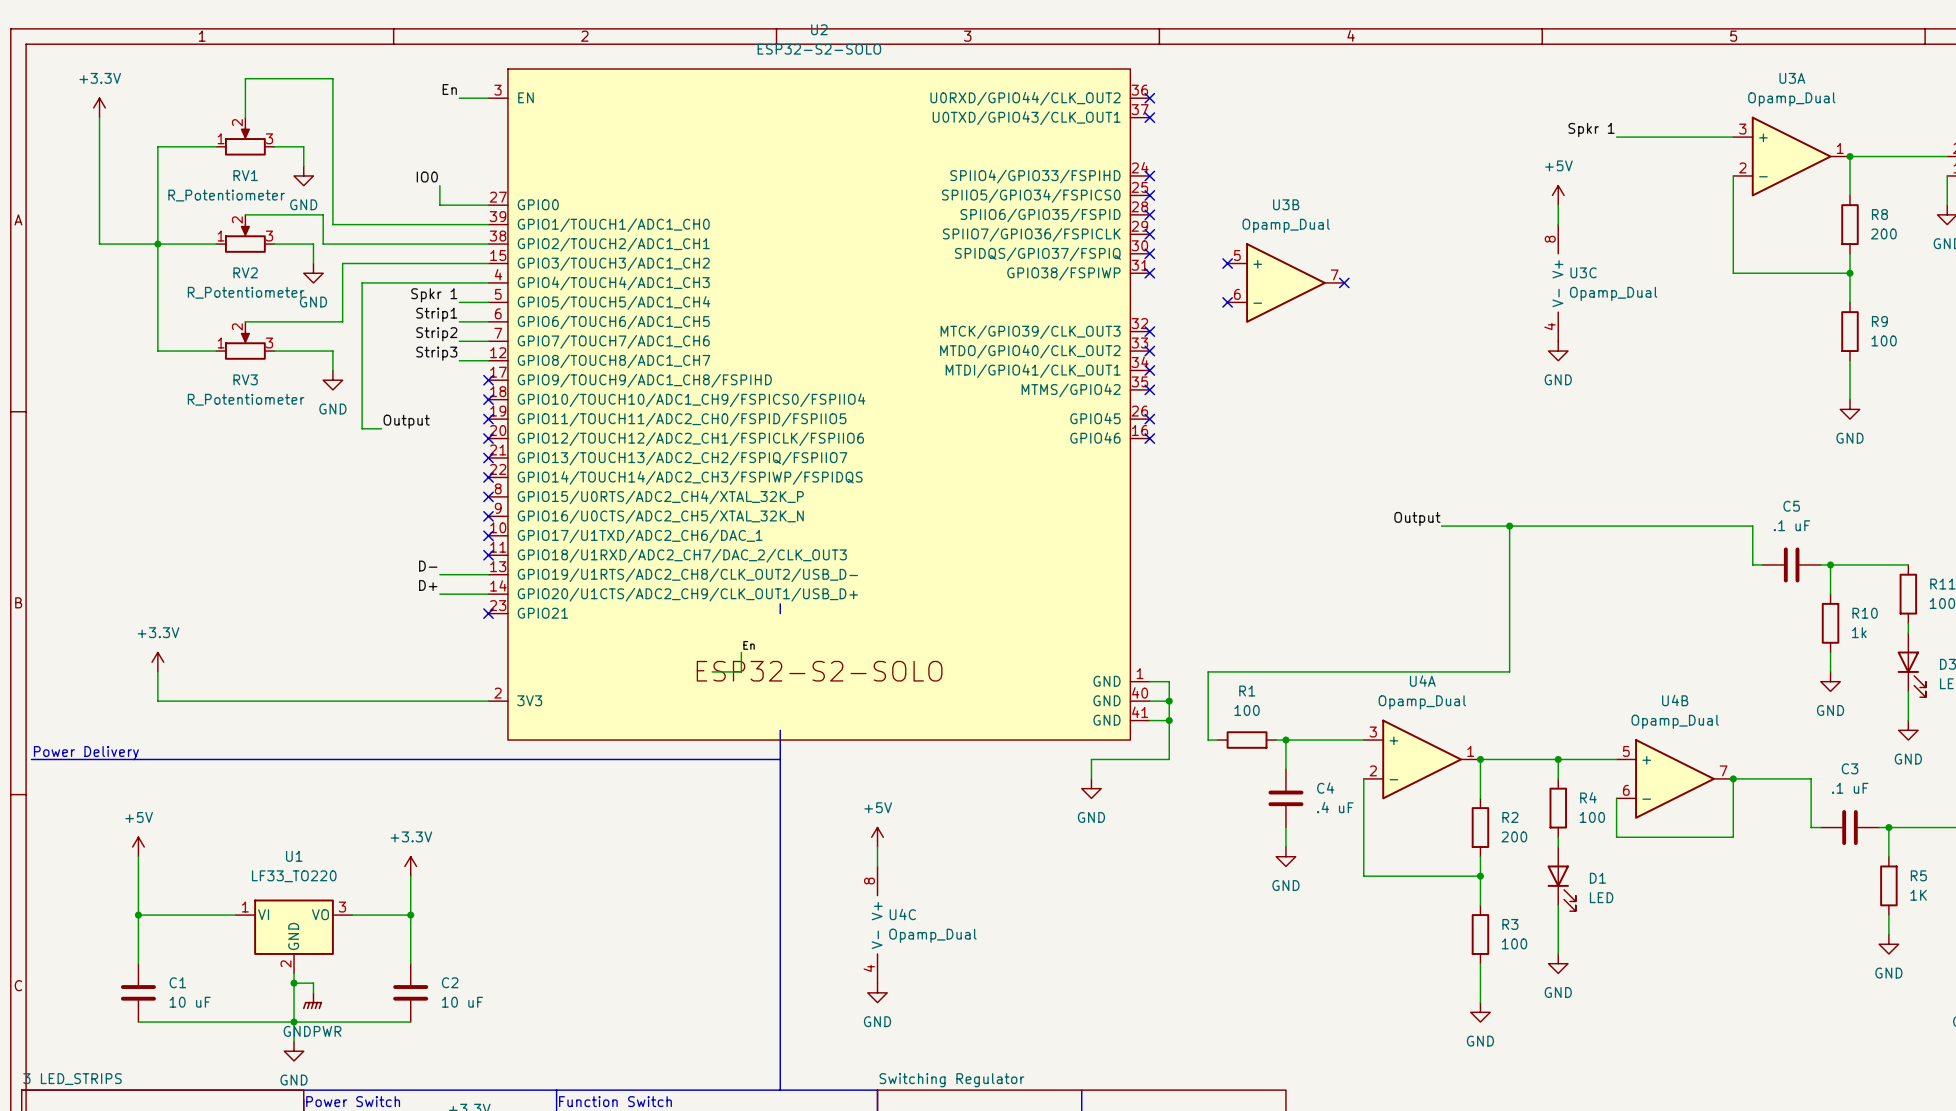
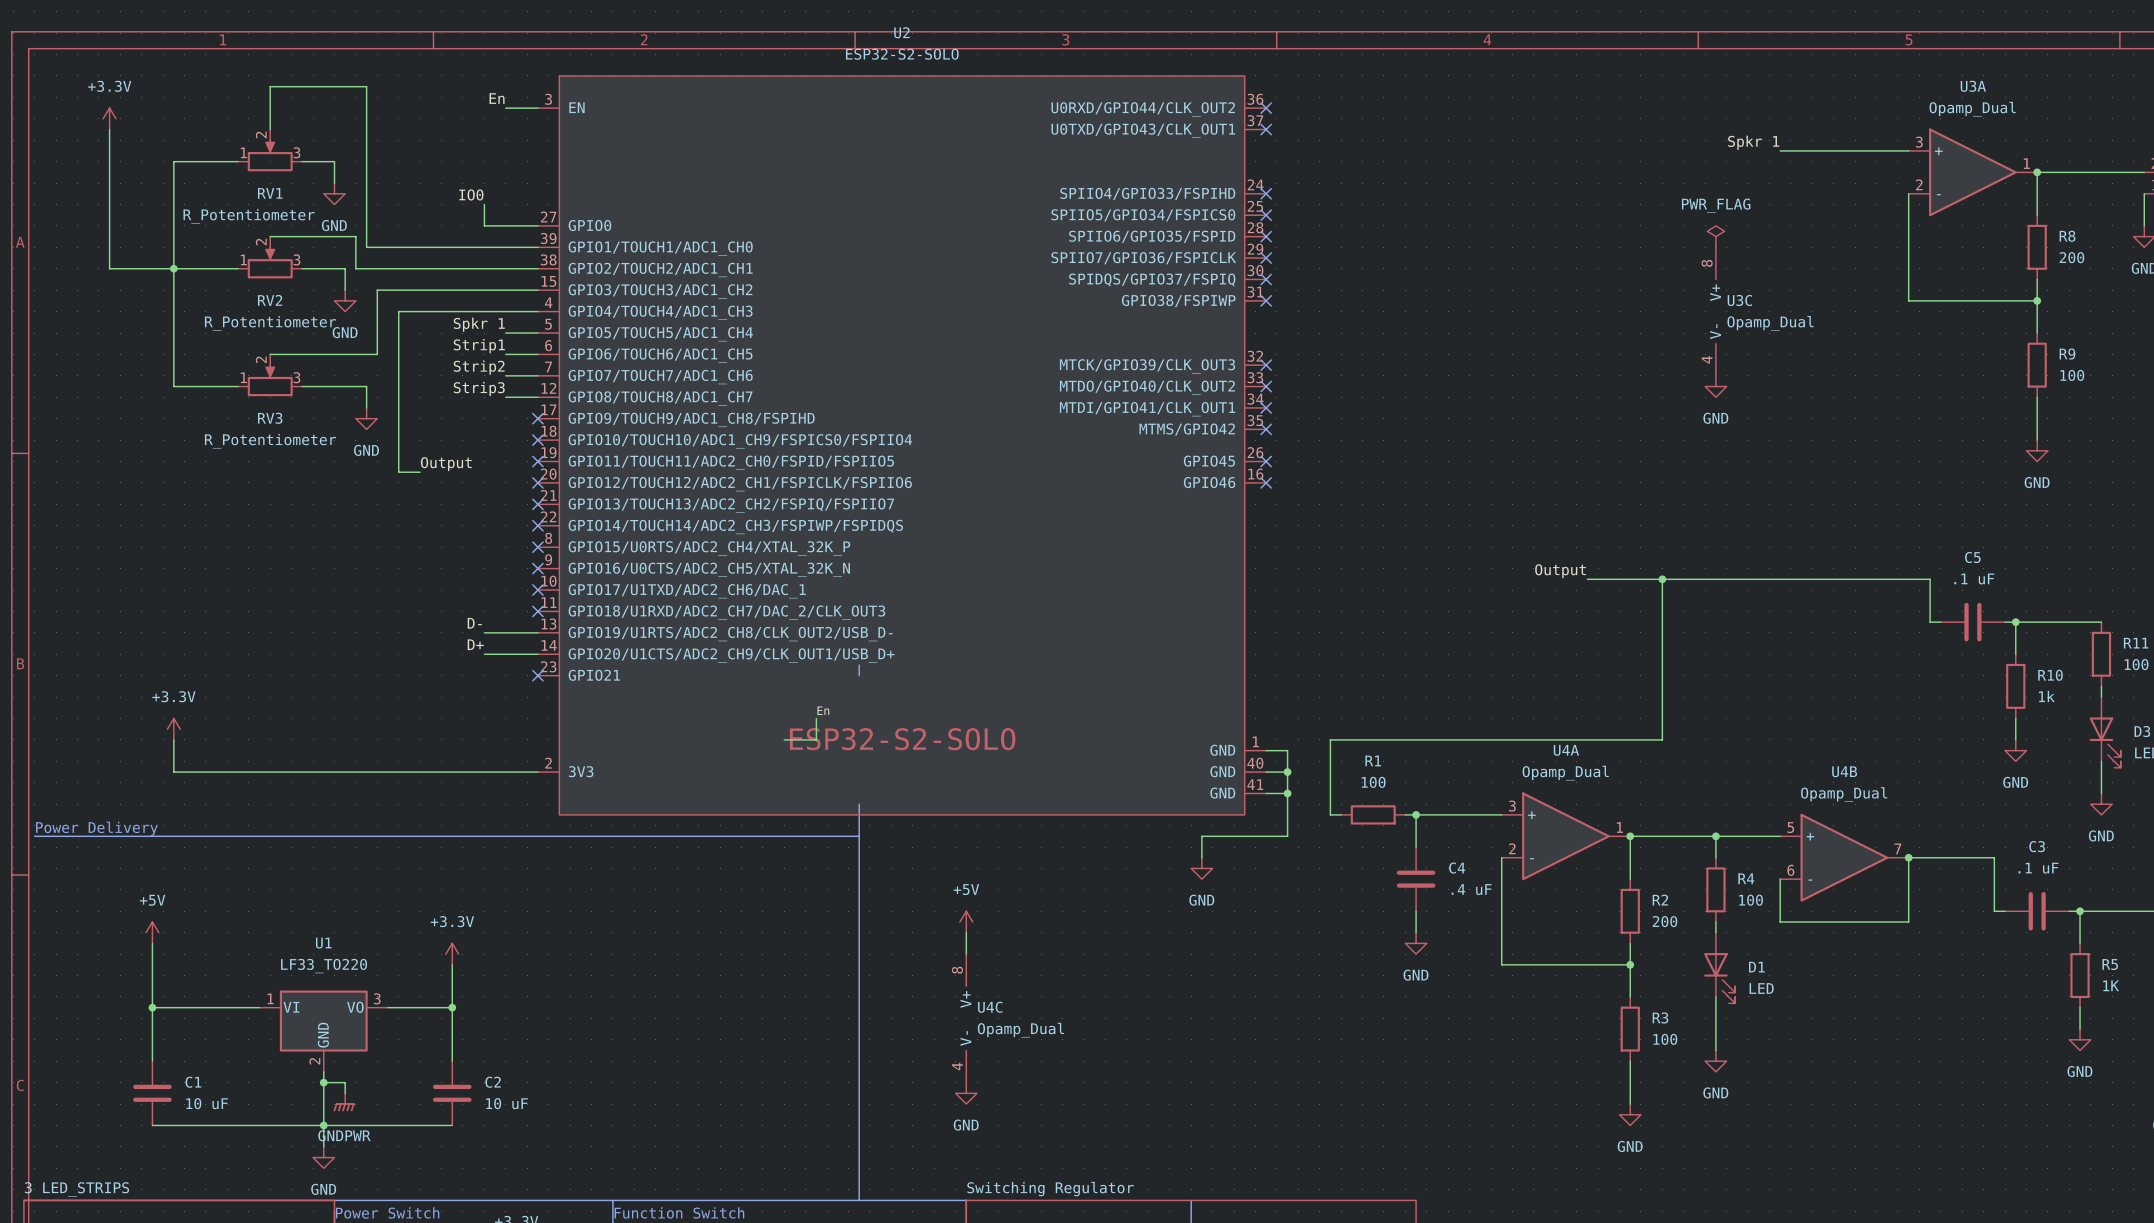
power symbol: +5V (1558, 195) -> none
power symbol: none -> PWR_FLAG (1715, 236)
no-connect mark: (1227, 263) -> none
U3B: Opamp_Dual (1285, 282) -> none
no-connect mark: (1344, 282) -> none
no-connect mark: (1227, 302) -> none

